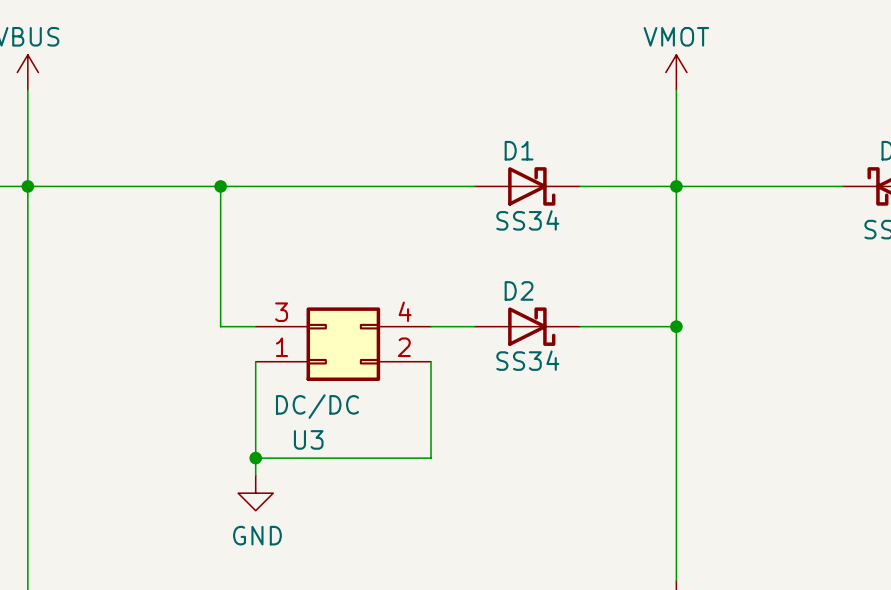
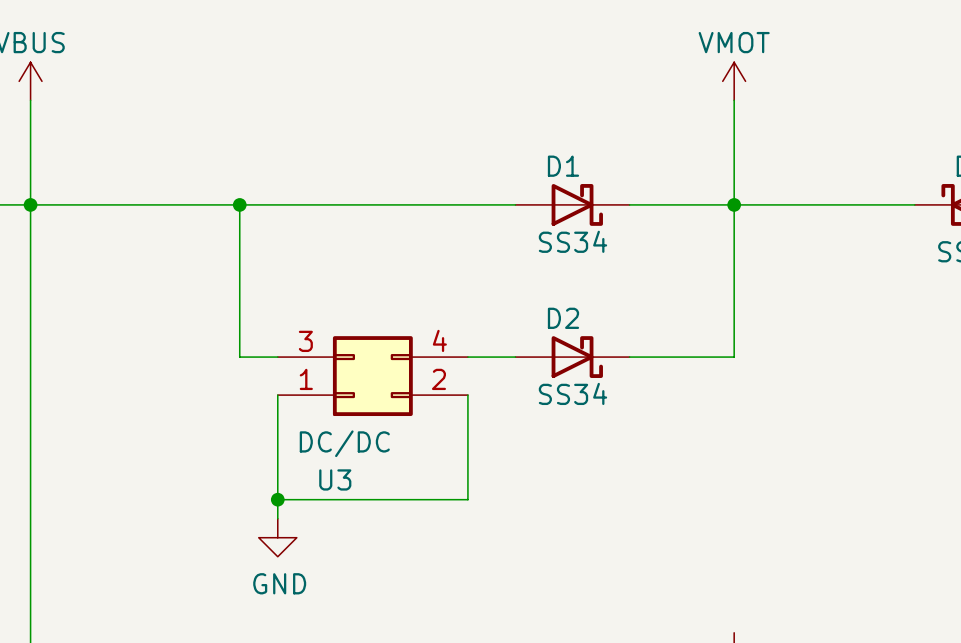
wire: (676, 326) (676, 580) -> none
junction: (676, 326) -> none

